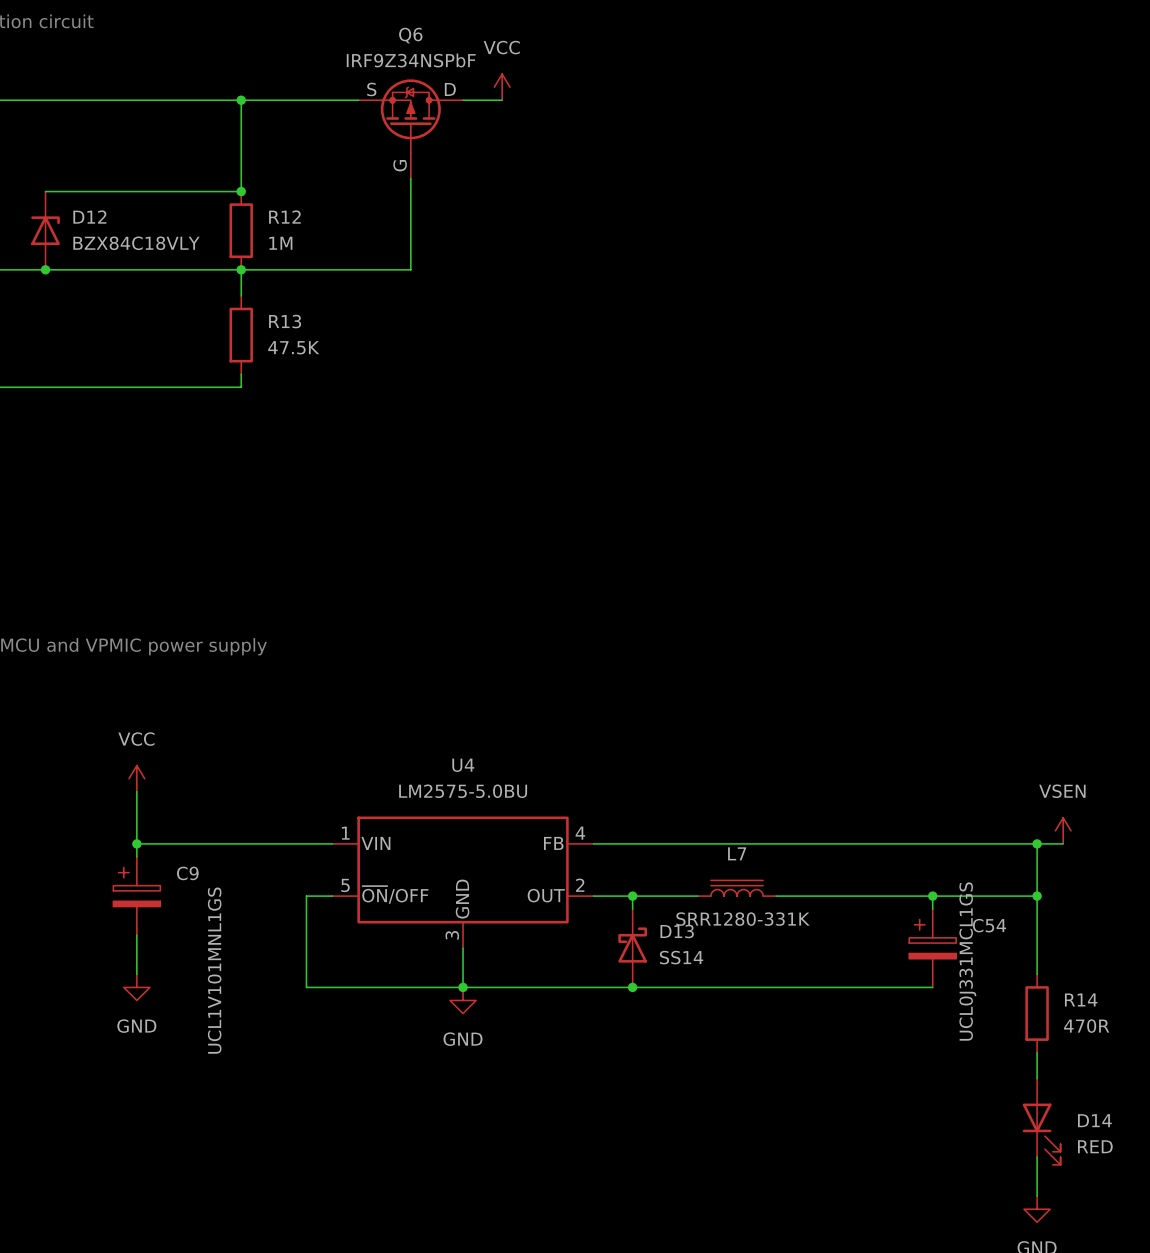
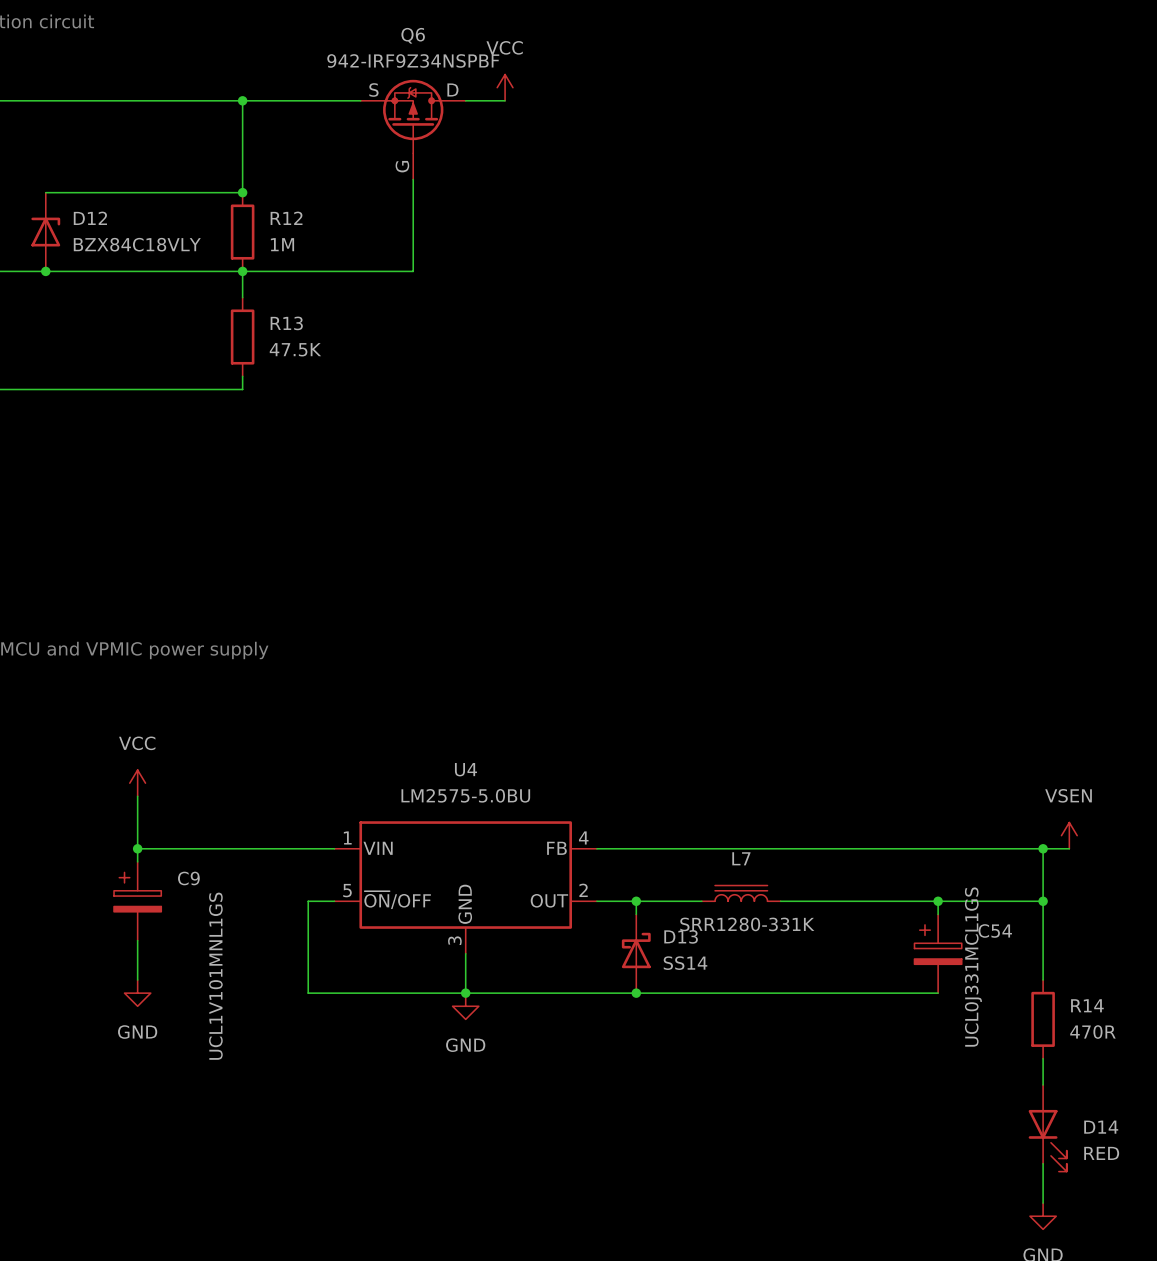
Q6 value: IRF9Z34NSPbF (411, 60) -> 942-IRF9Z34NSPBF (413, 60)

